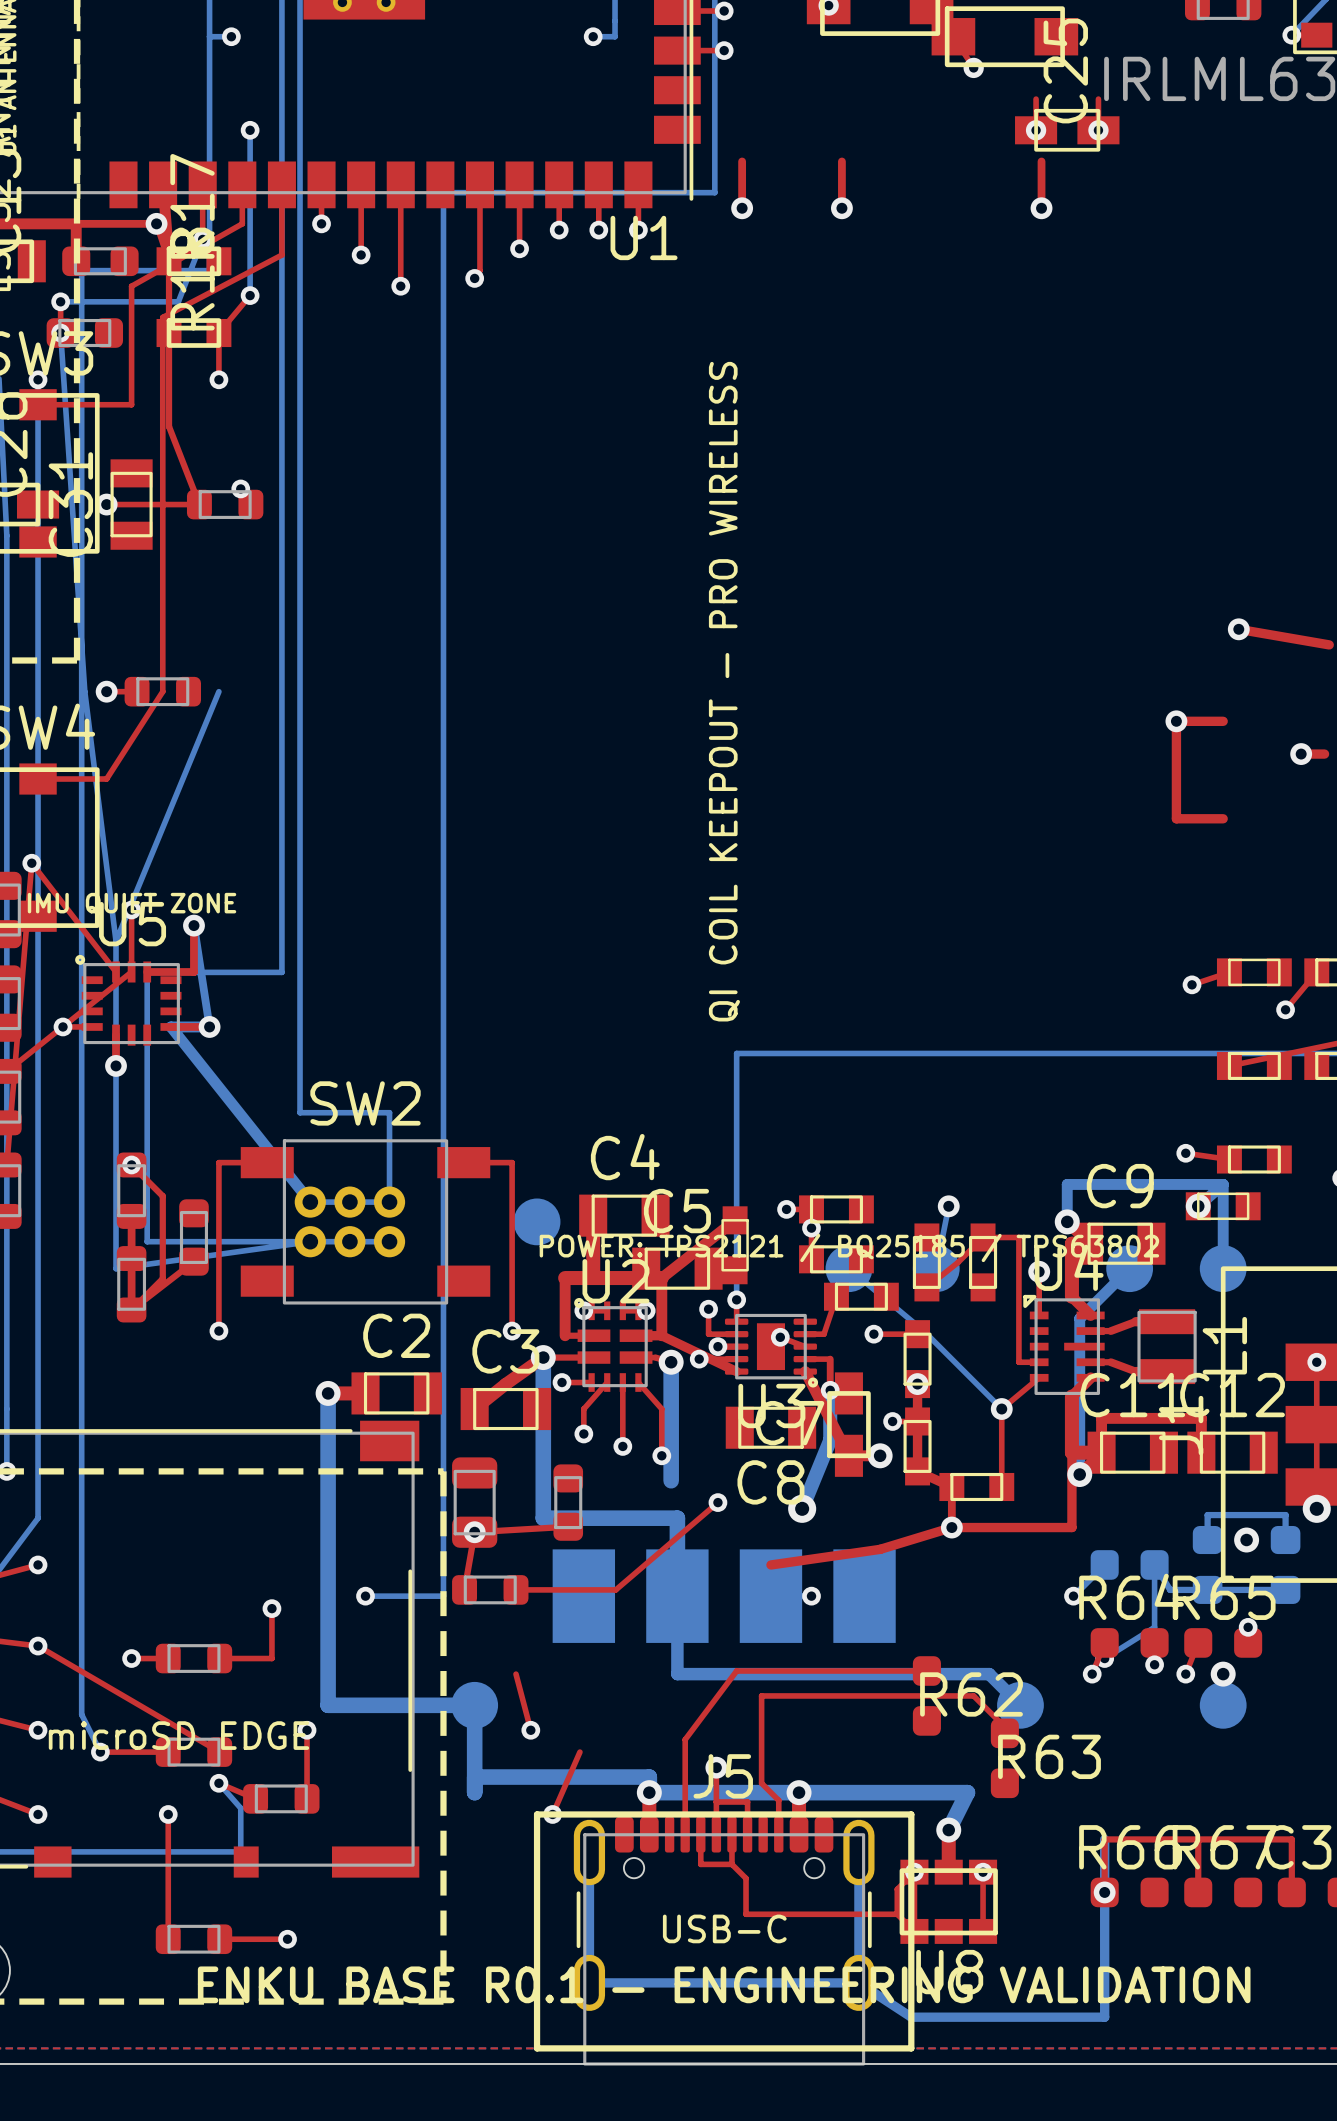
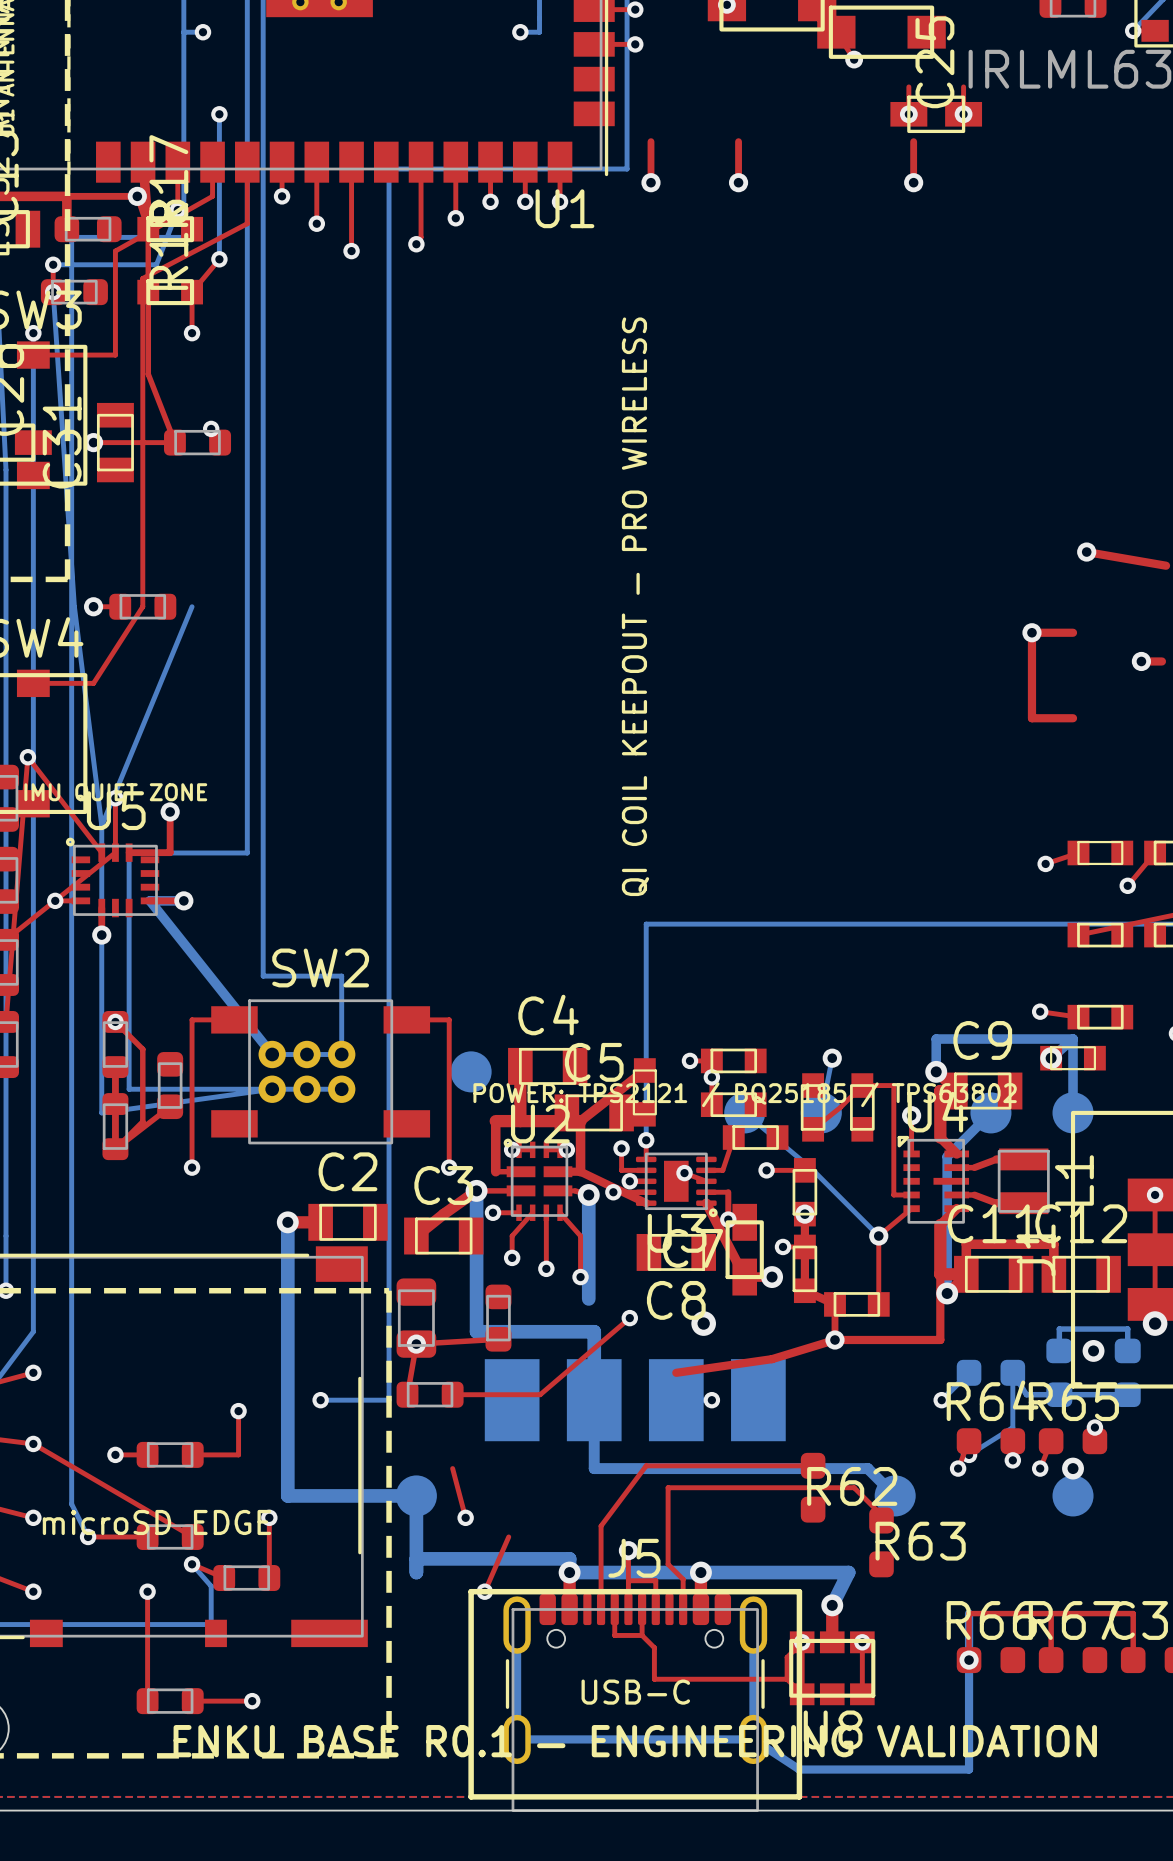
bottom track: (193, 925) (209, 1026) -> none
bottom track: (830, 1390) (830, 1440) (802, 1508) -> none

